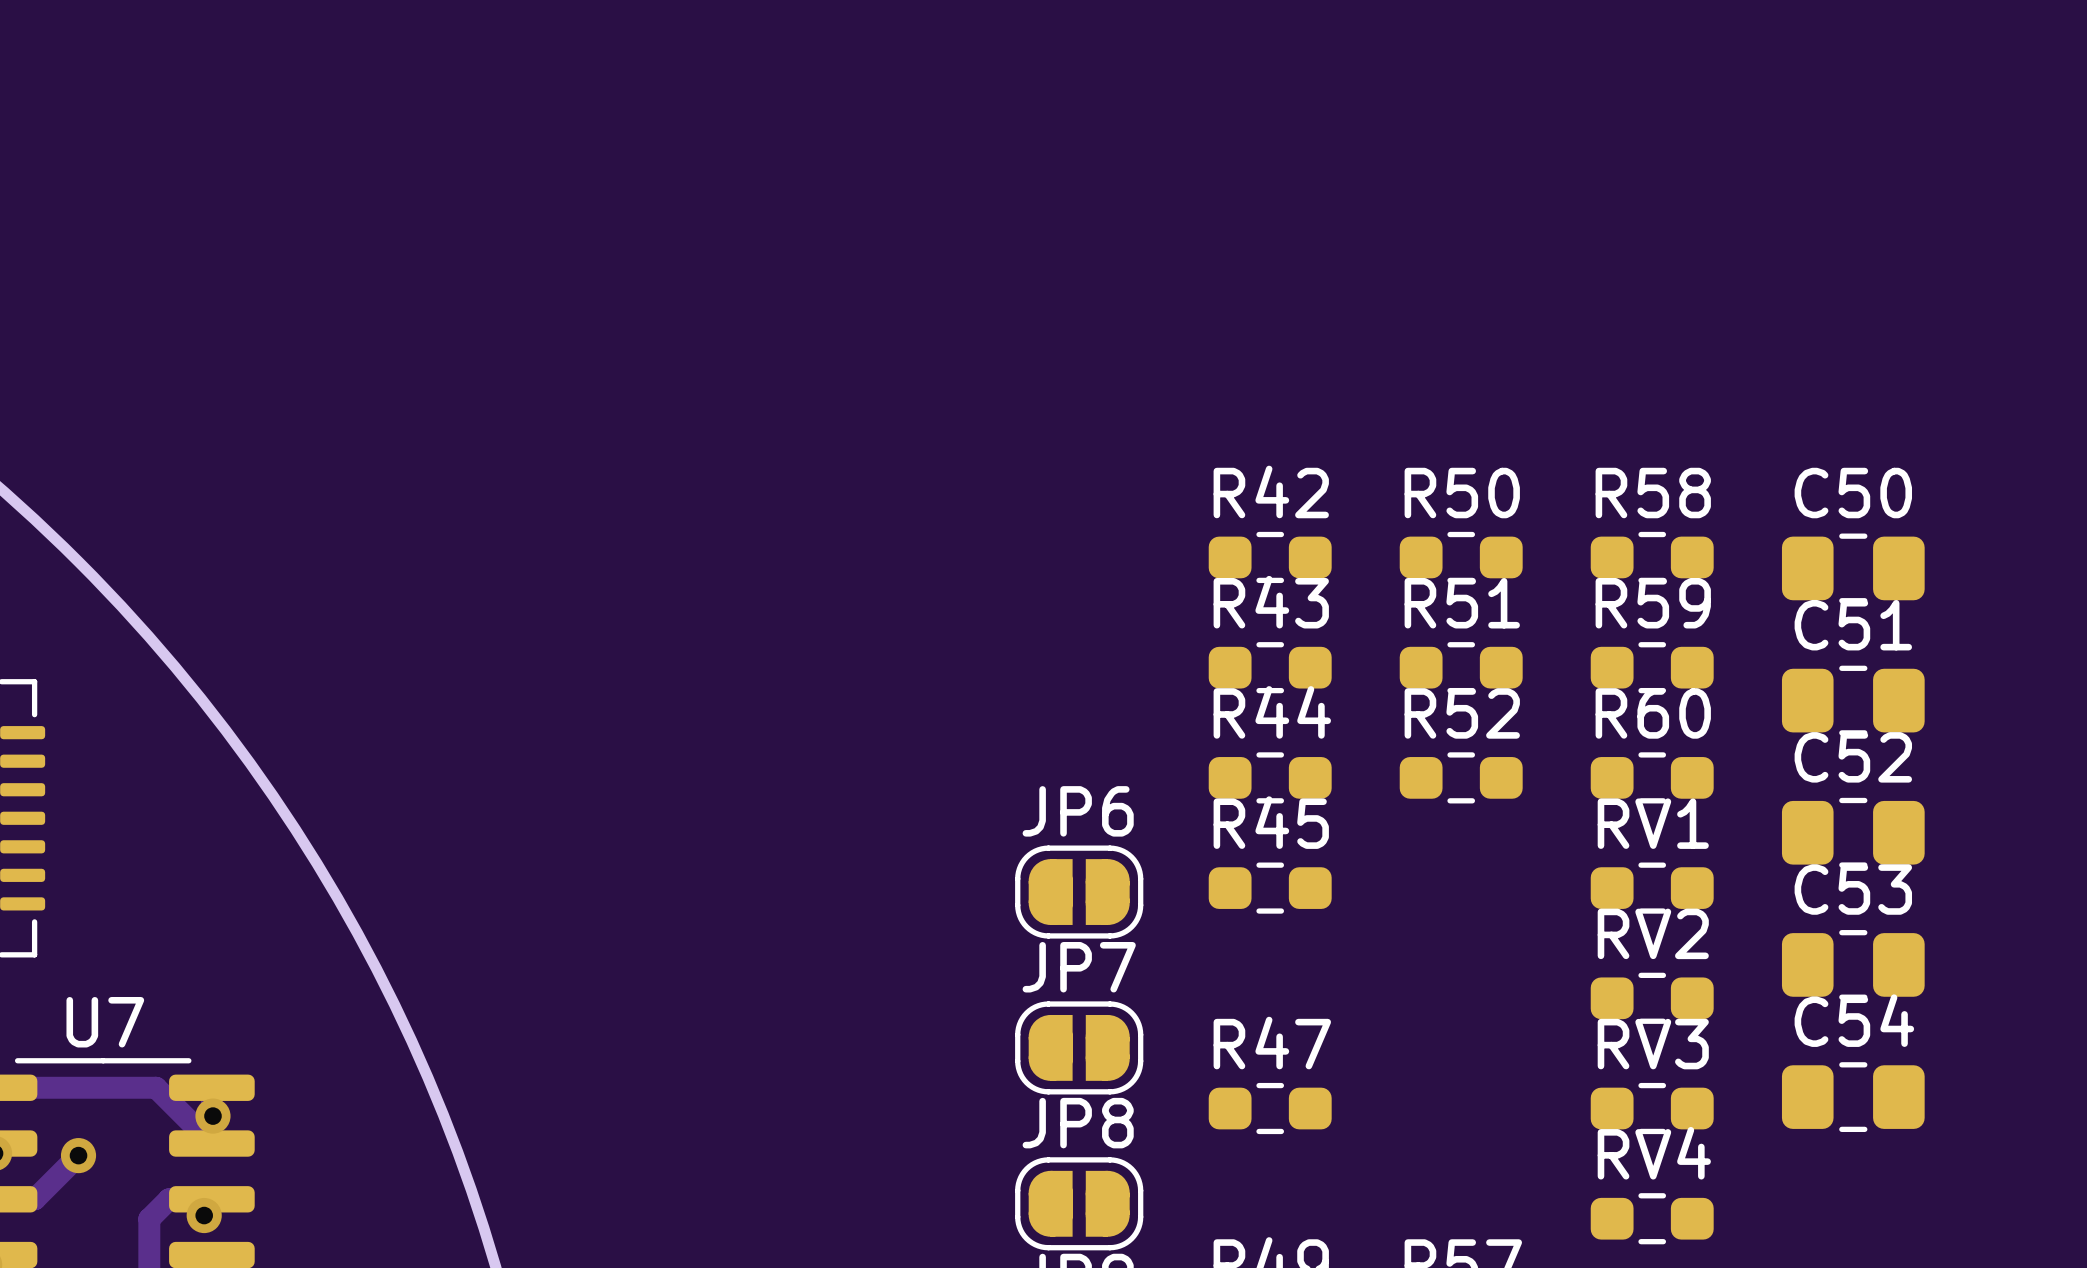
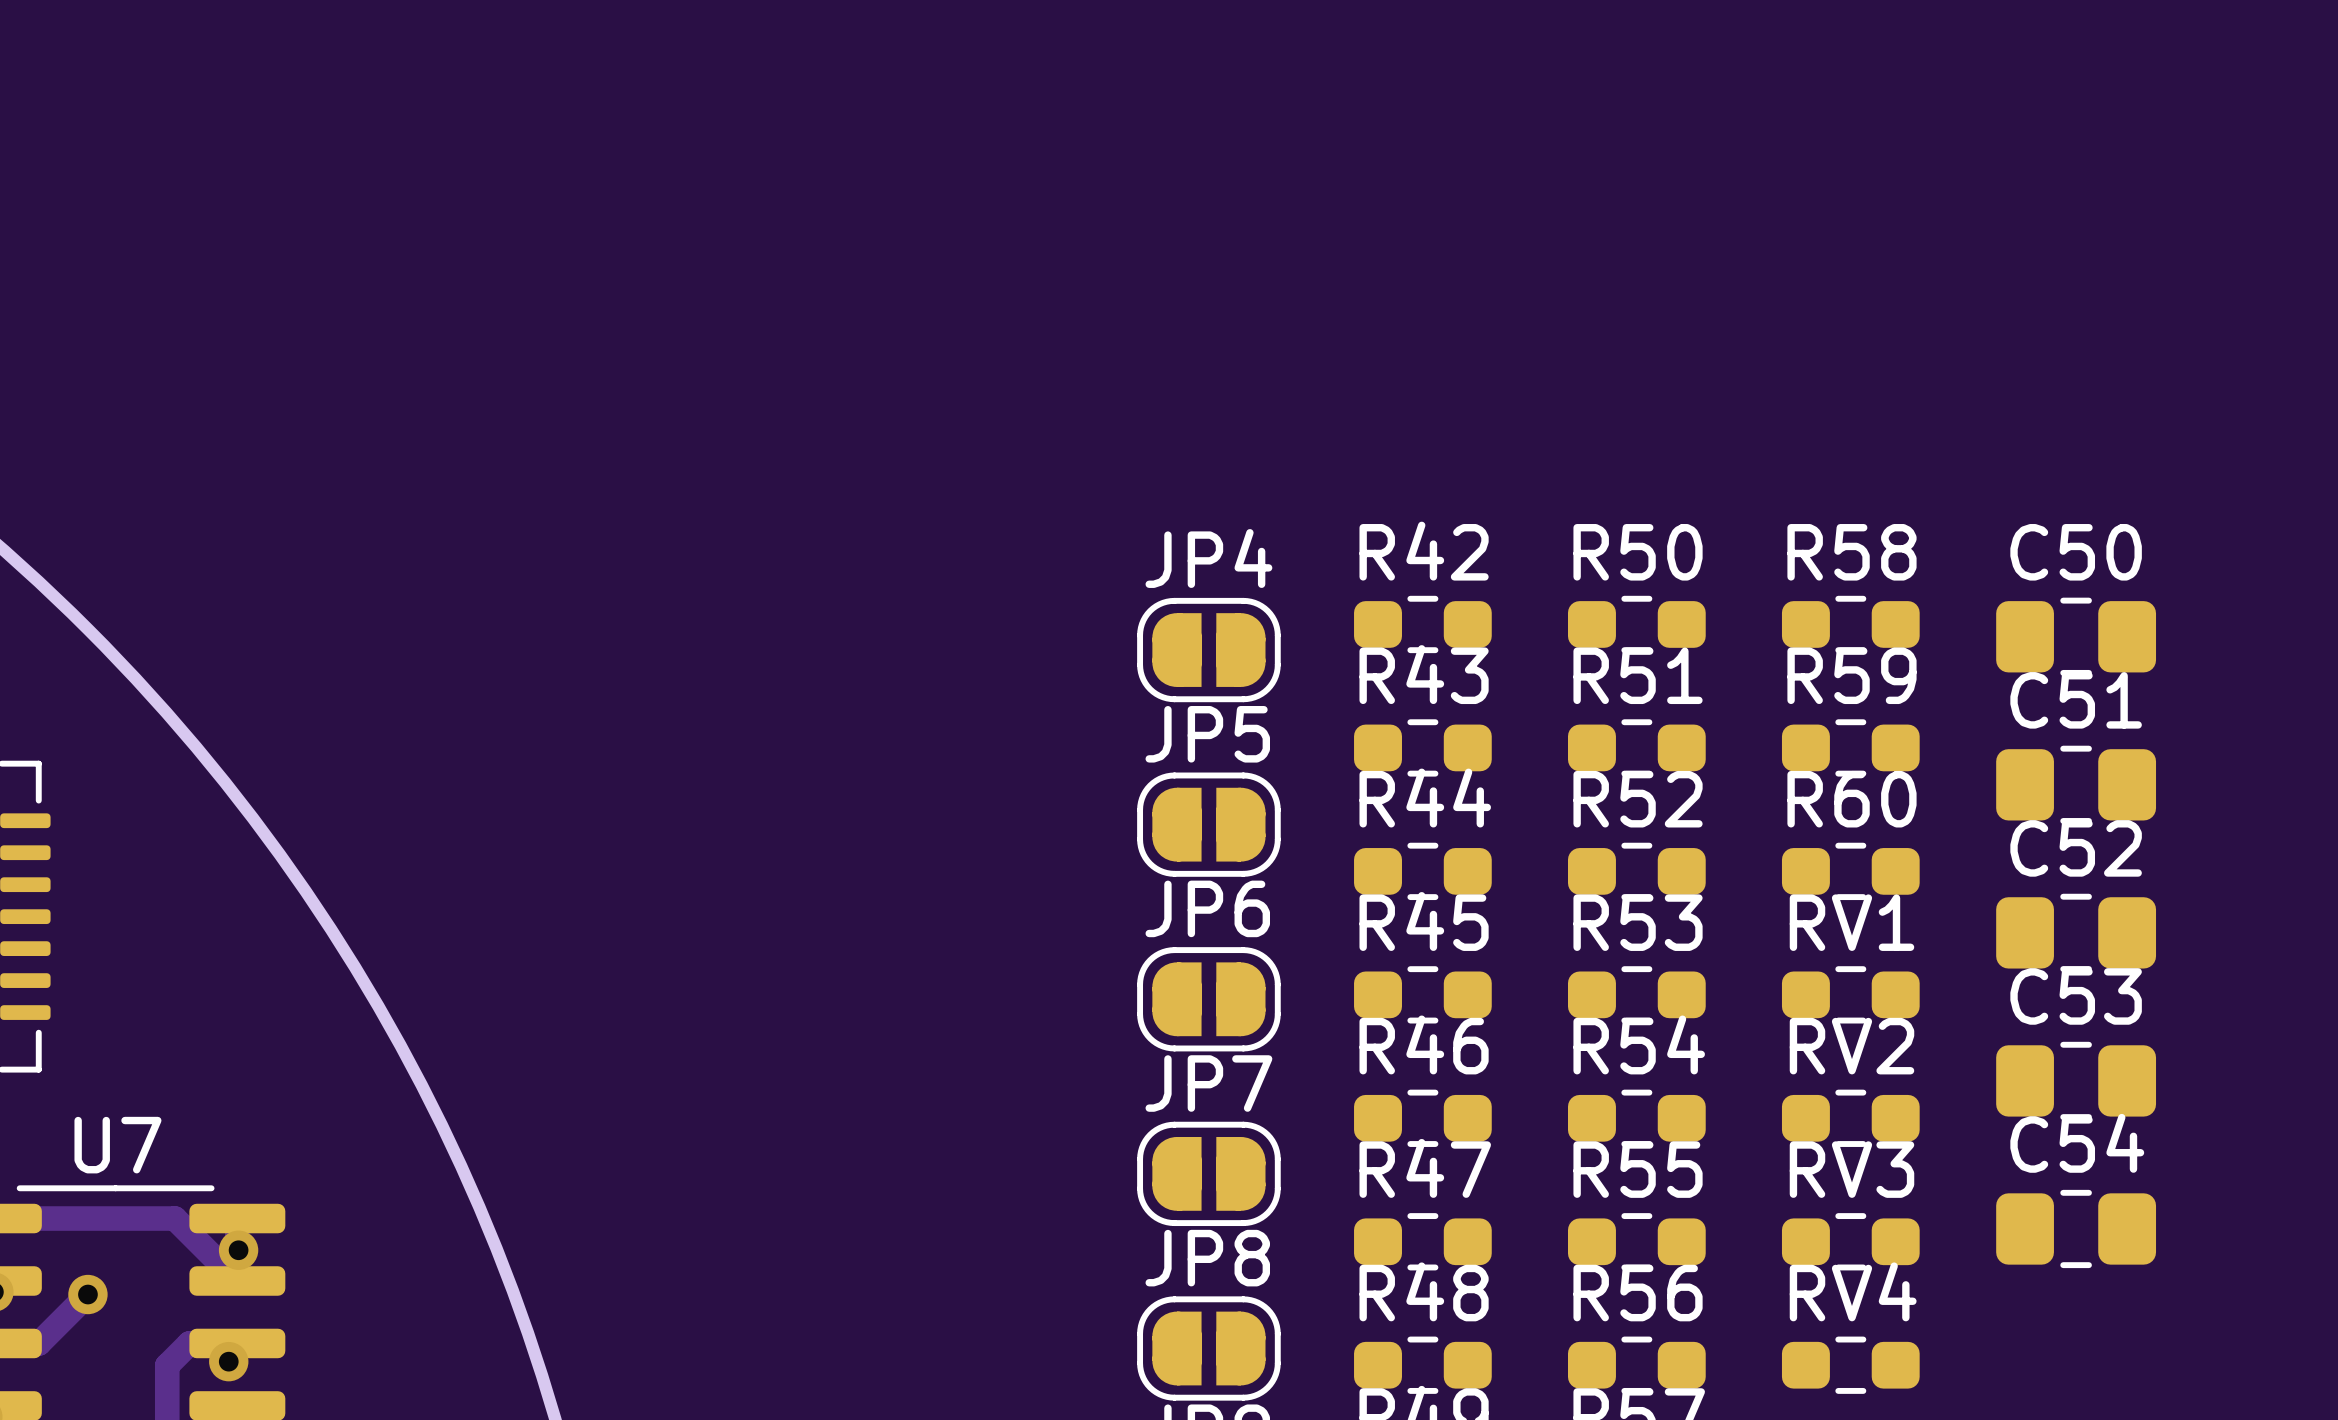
JP4: none -> (1208, 650)
JP5: none -> (1208, 824)
R53: none -> (1636, 994)
R46: none -> (1422, 1118)
R54: none -> (1636, 1118)
R55: none -> (1636, 1241)
R48: none -> (1422, 1365)
R56: none -> (1636, 1365)

